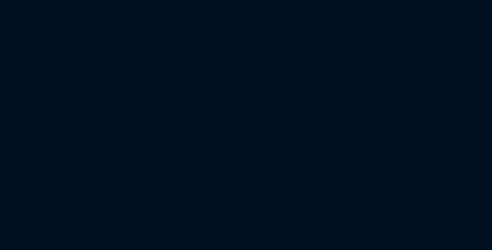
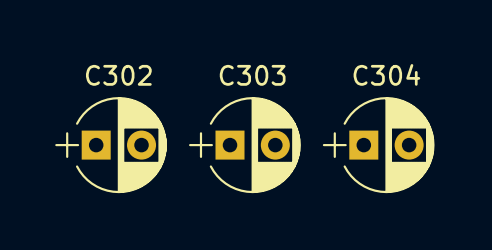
C302: none -> (111, 145)
C303: none -> (244, 145)
C304: none -> (378, 145)

